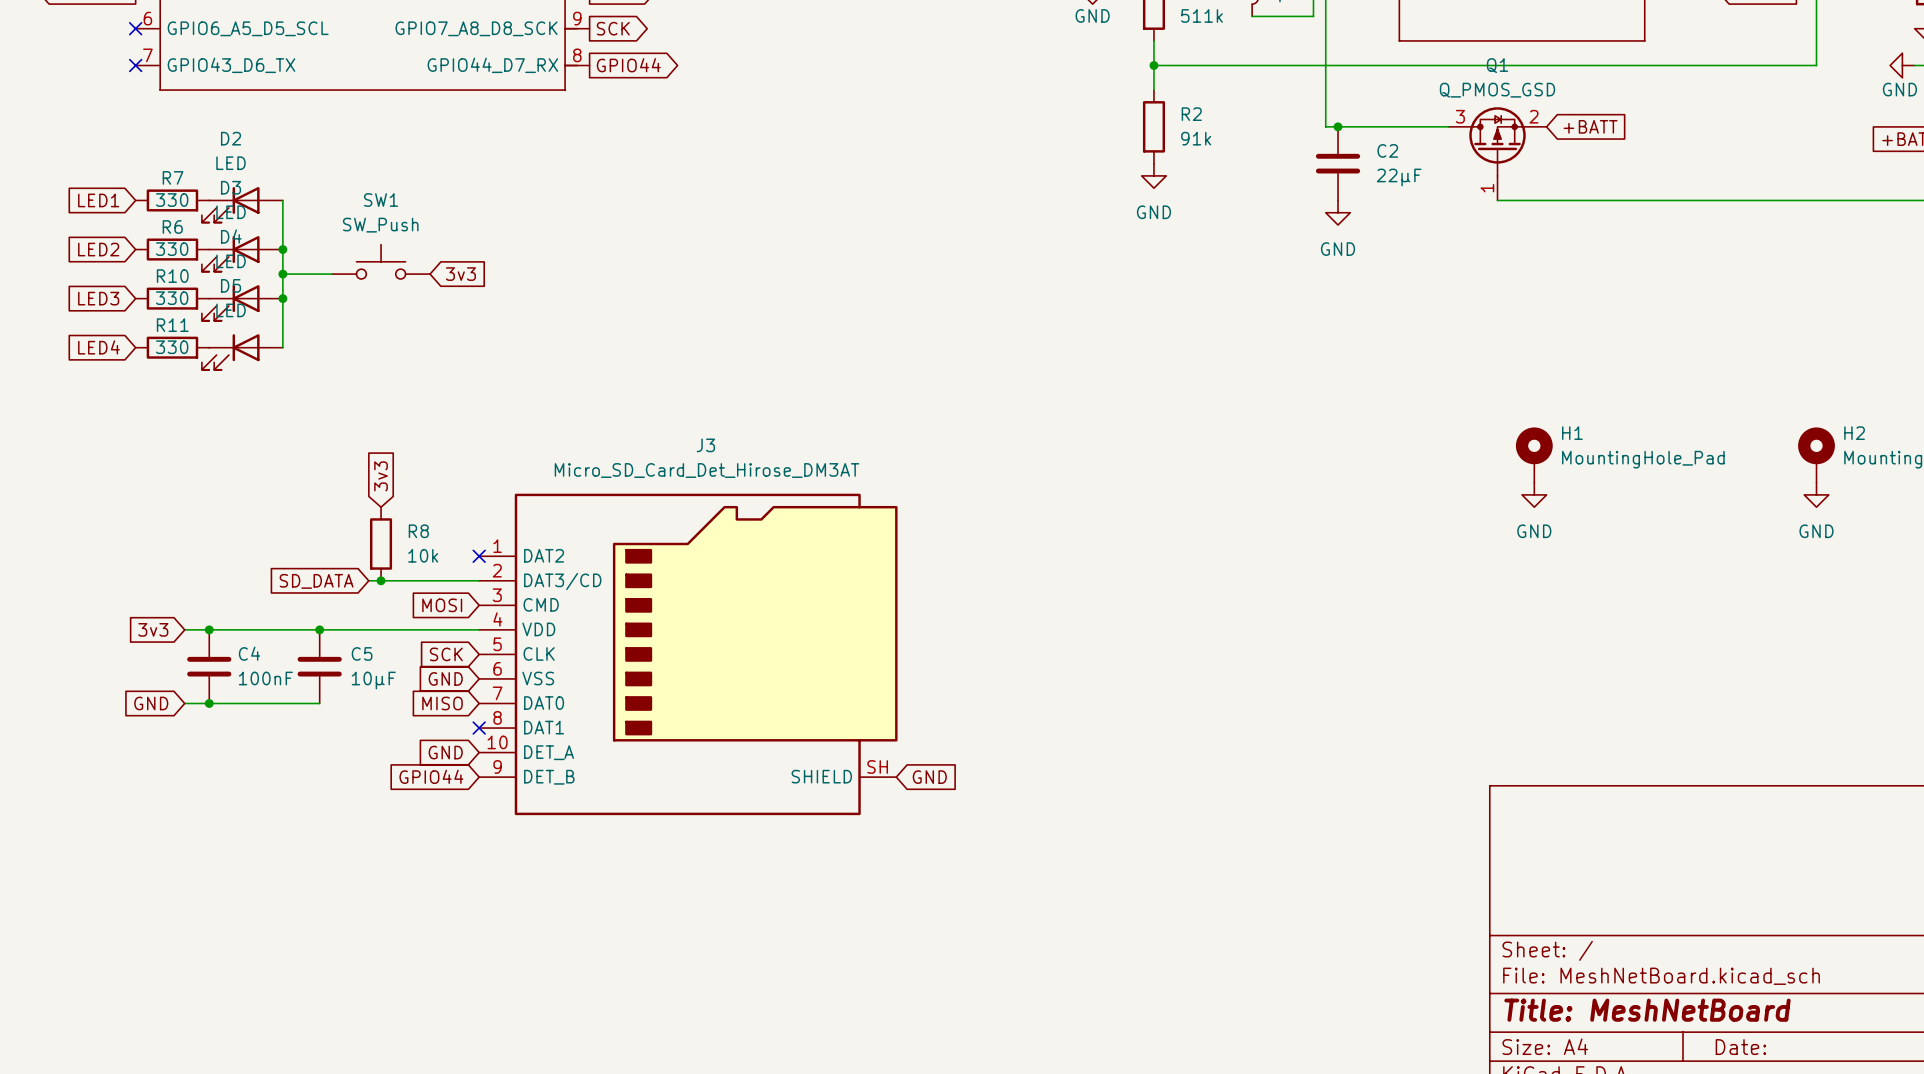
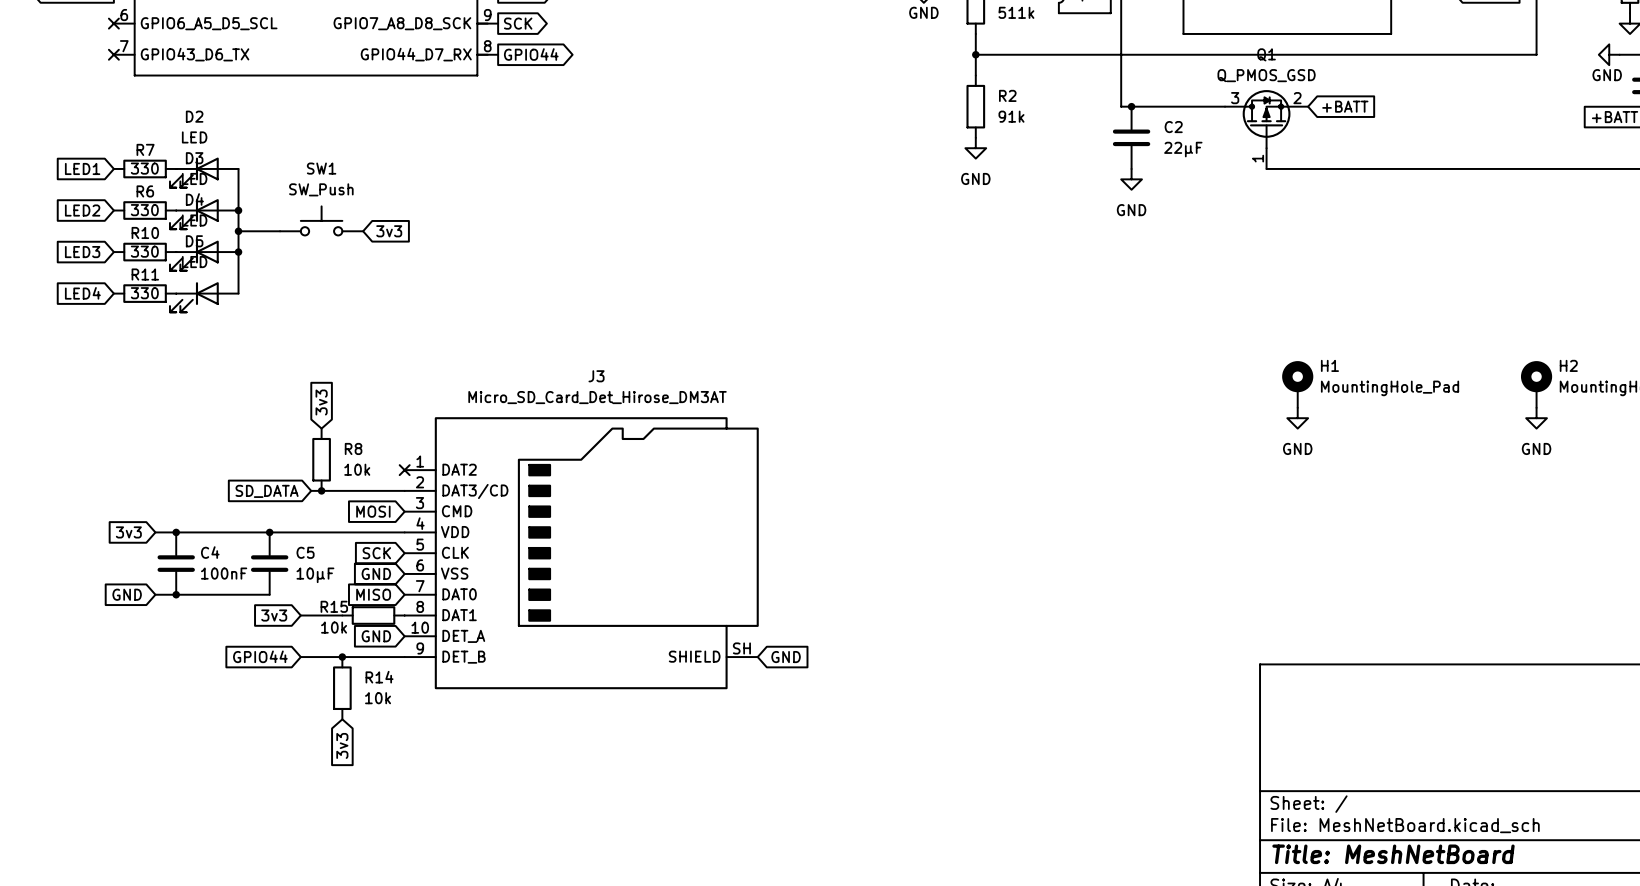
global label: none -> 3v3 (274, 615)
wire: none -> (300, 615) (342, 615)
R15: none -> 10k (373, 615)
no-connect mark: (479, 728) -> none
global label position: GPIO44 (431, 776) -> GPIO44 (260, 656)
wire: none -> (300, 657) (404, 657)
junction: none -> (342, 657)
R14: none -> 10k (342, 688)
global label: none -> 3v3 (342, 745)

